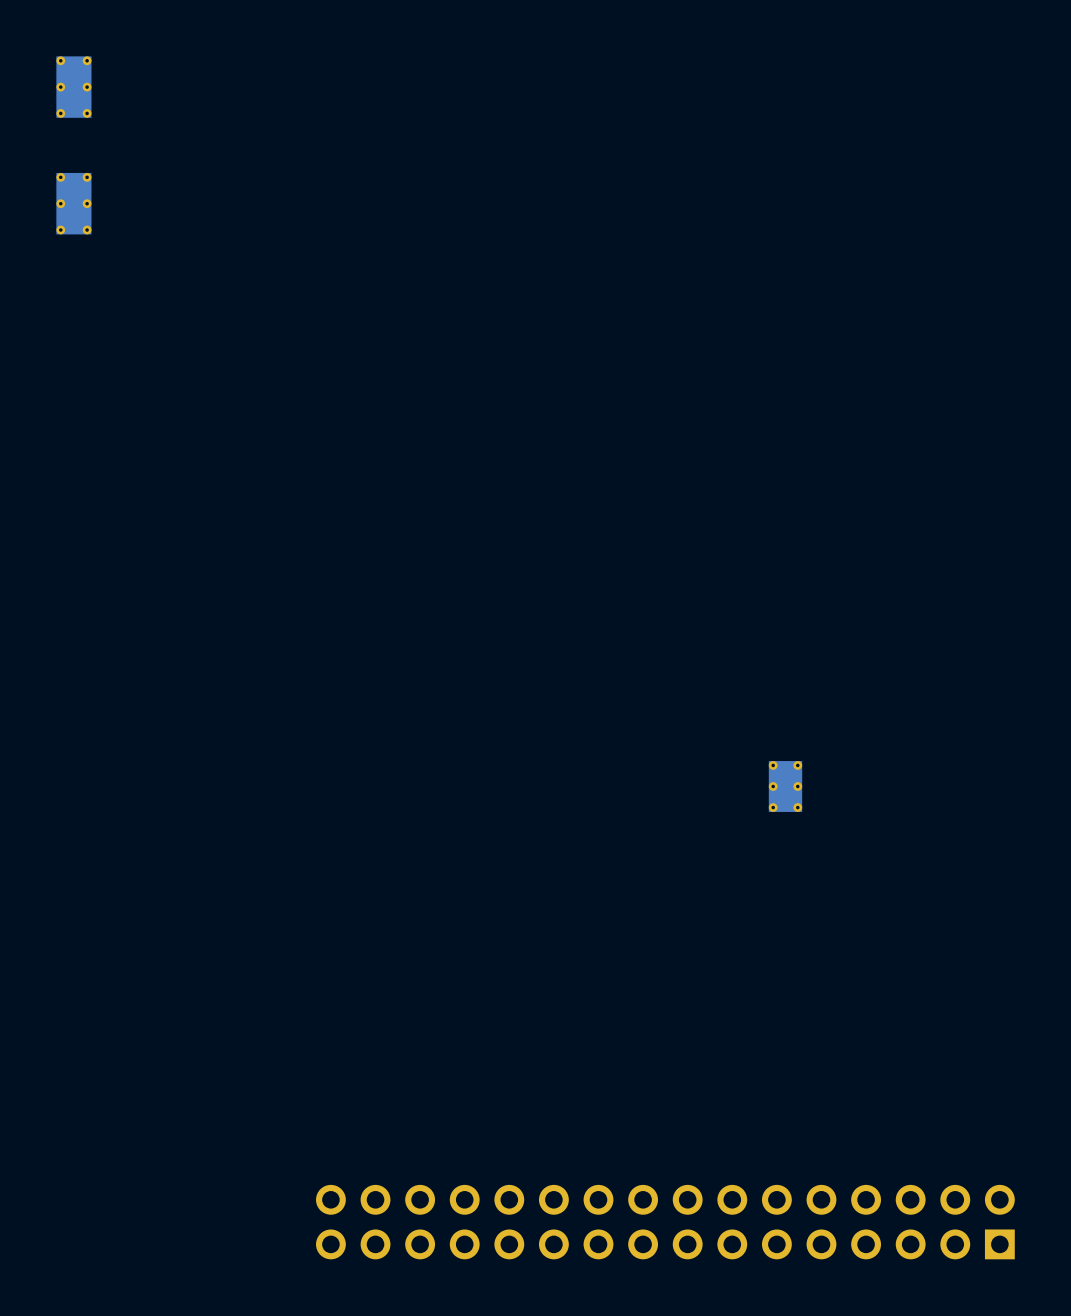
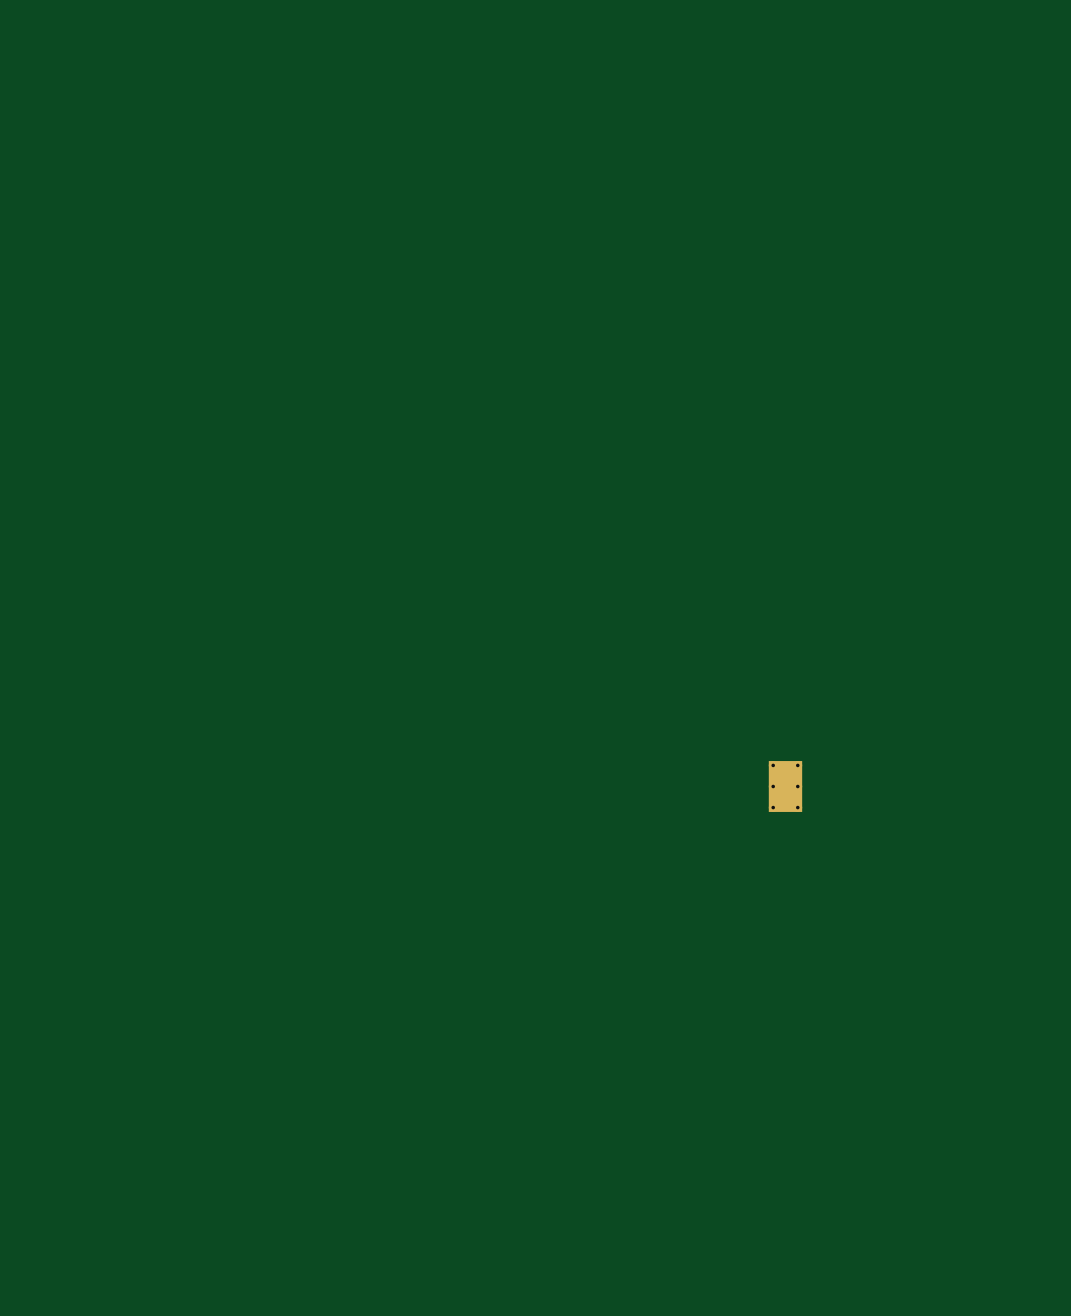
part: (73, 87) -> none
part: (73, 203) -> none
part: (665, 1222) -> none

